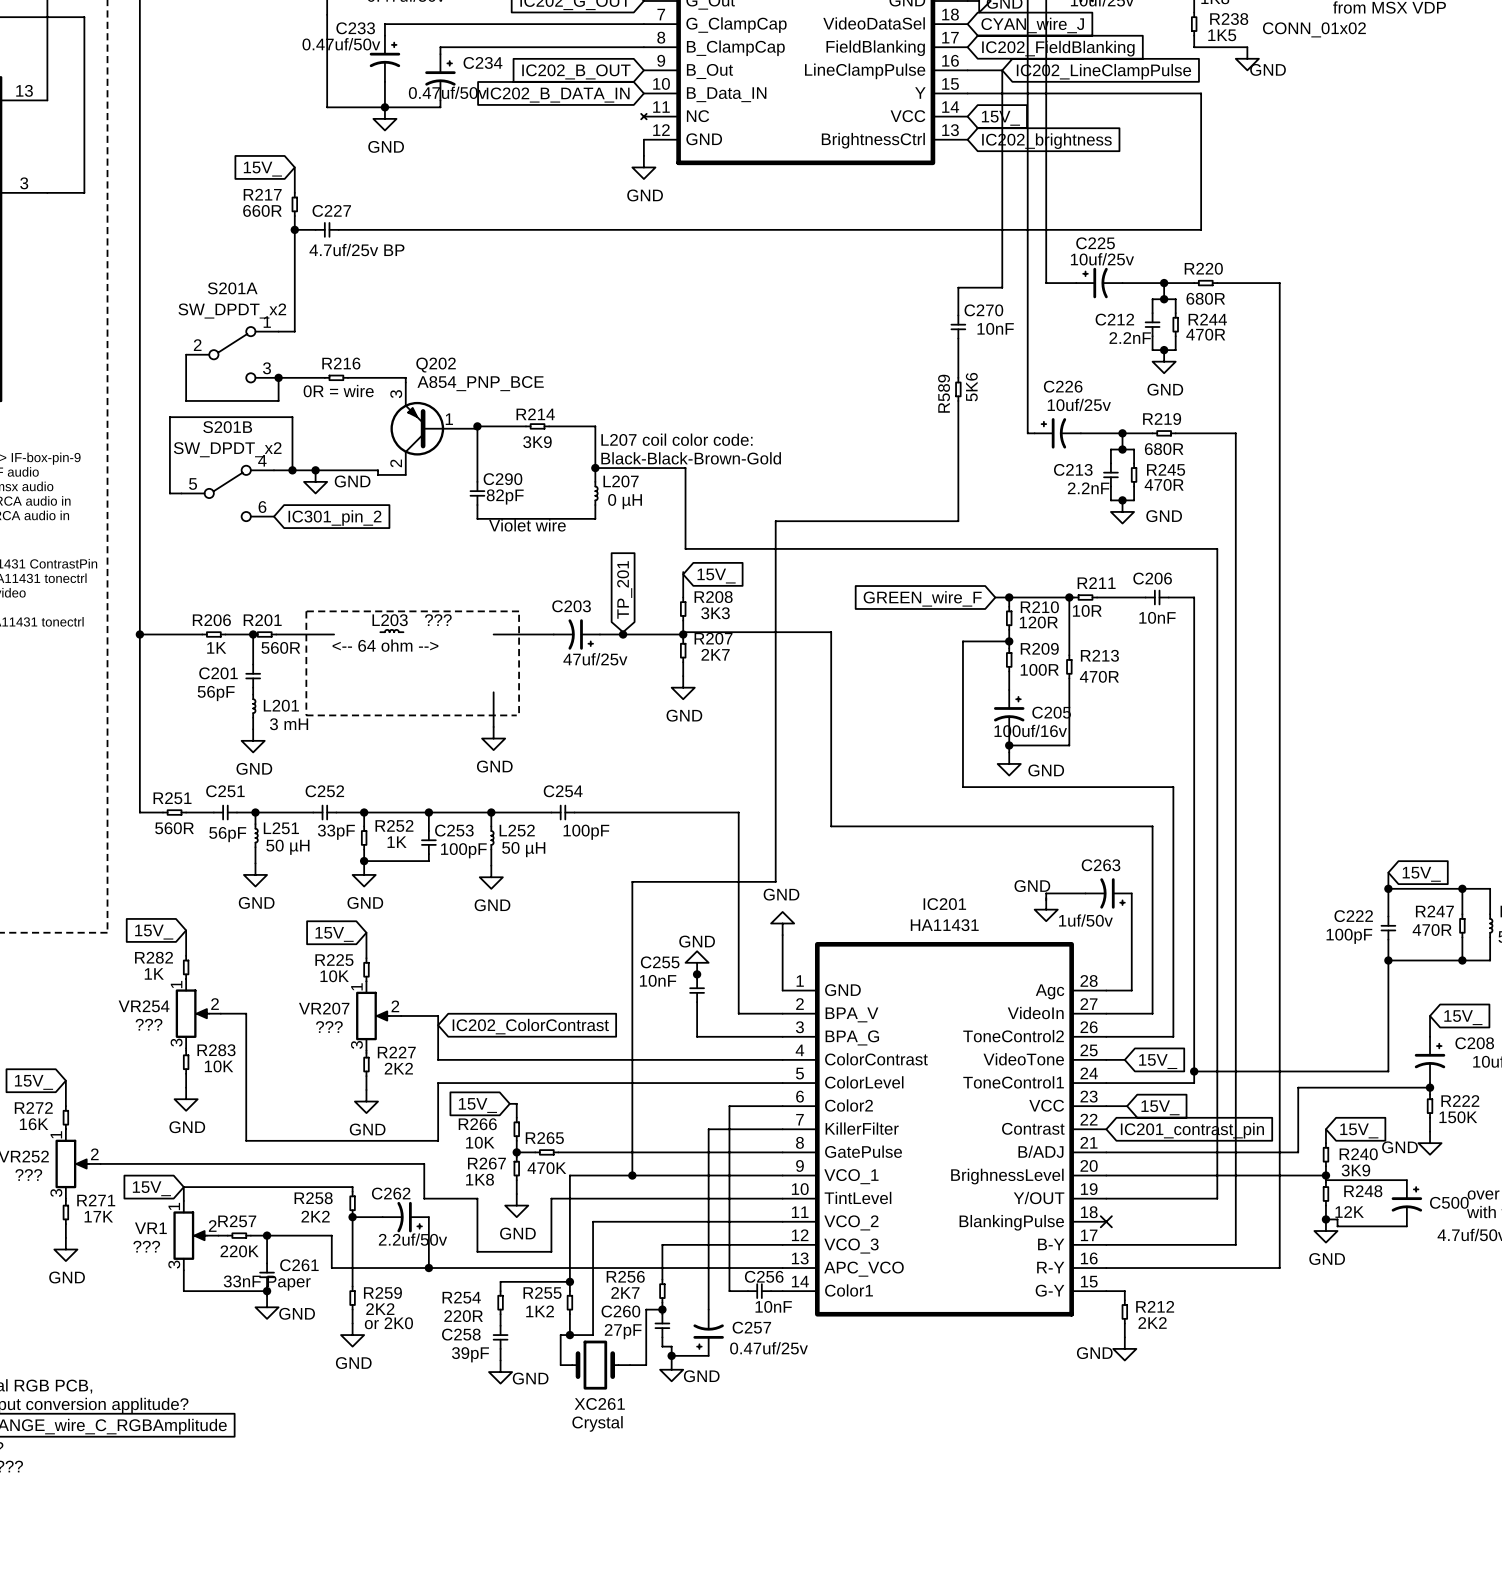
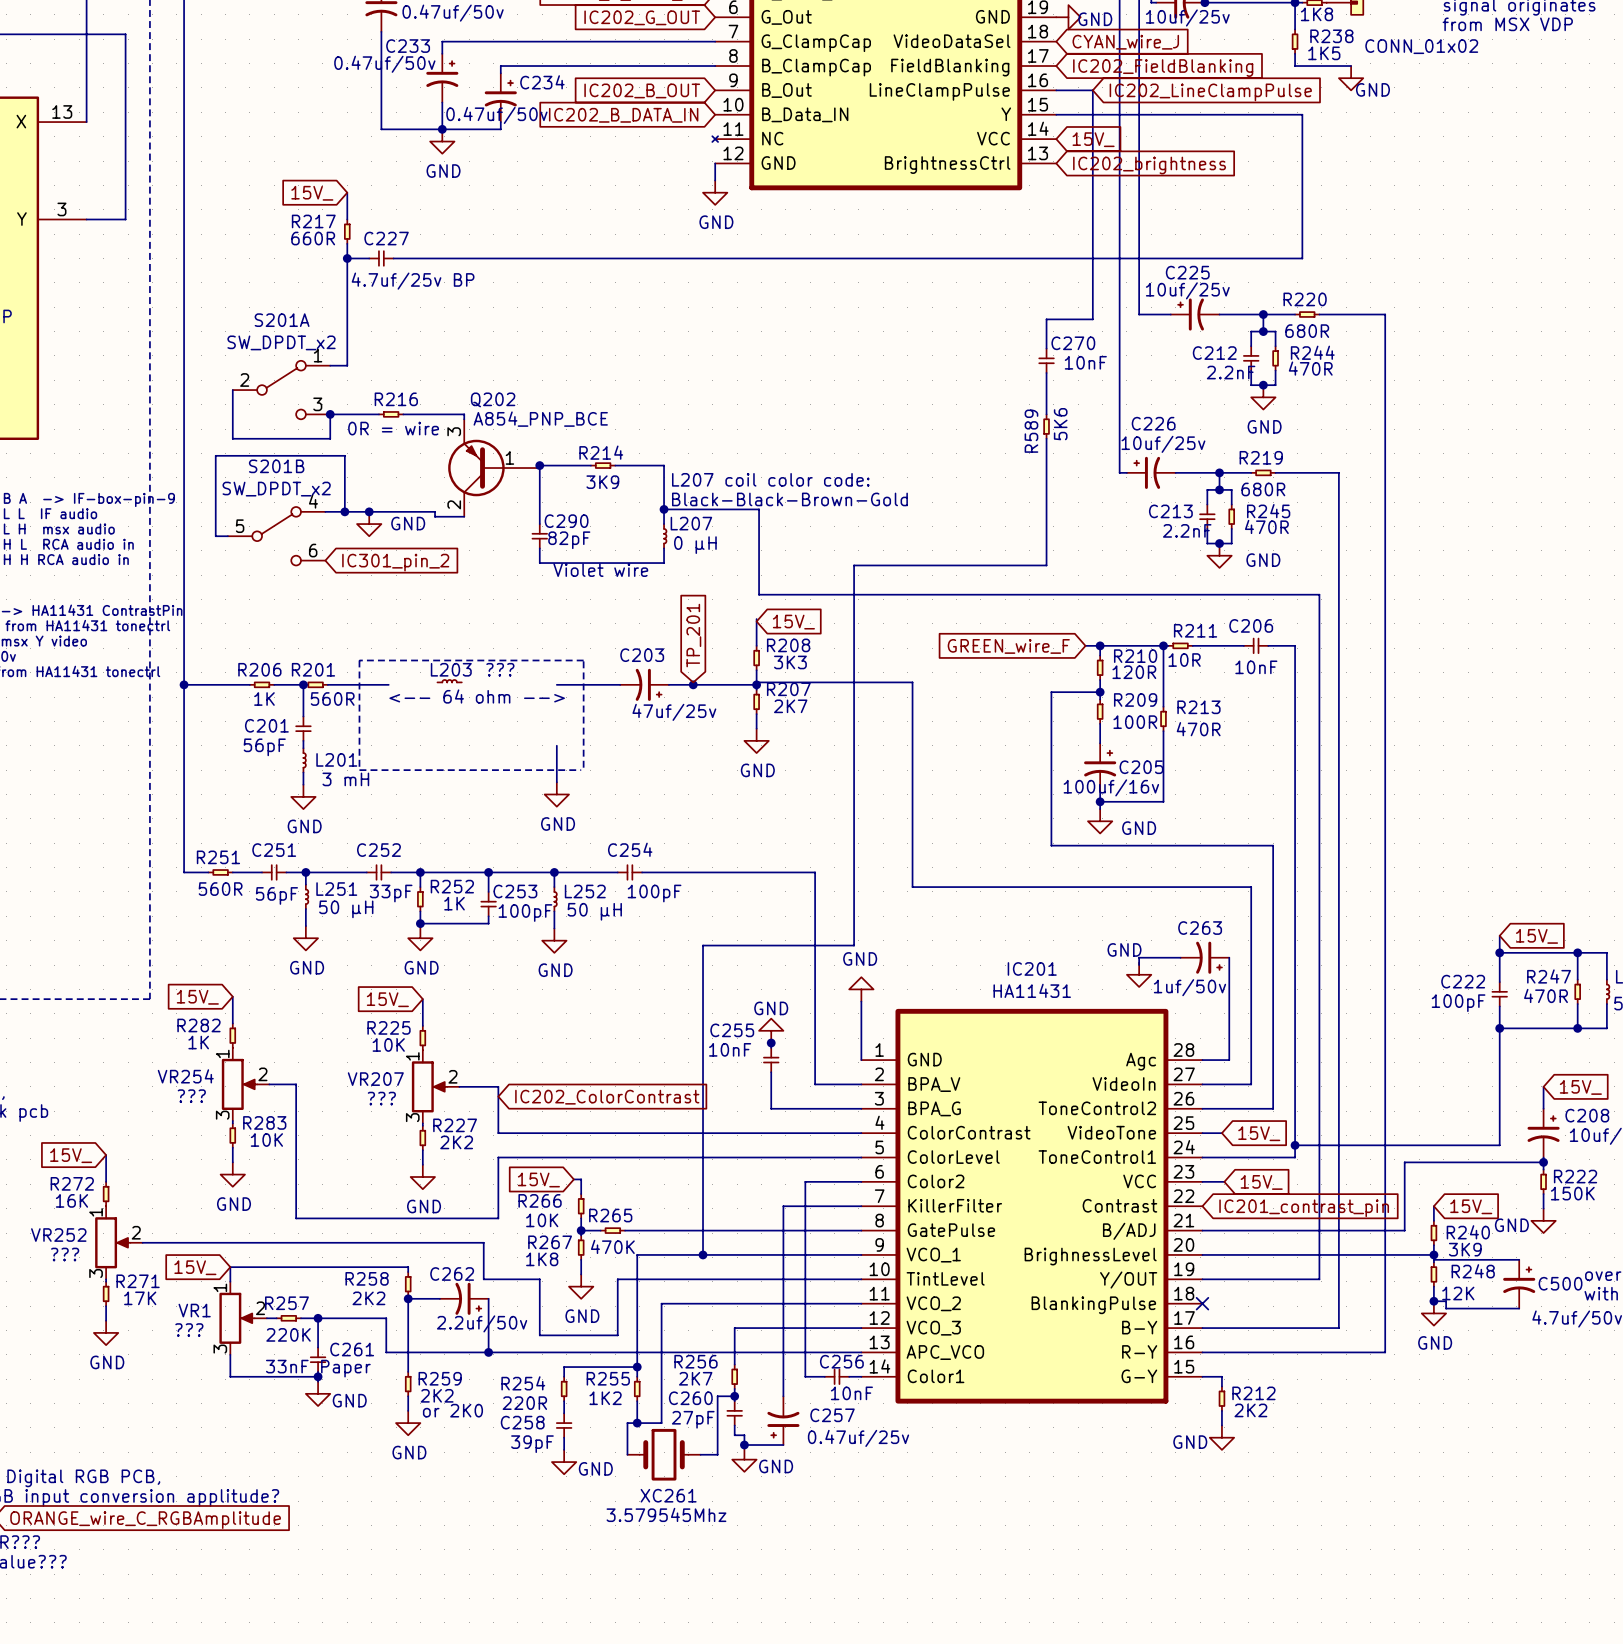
XC261 value: Crystal (597, 1423) -> 3.579545Mhz (666, 1514)

